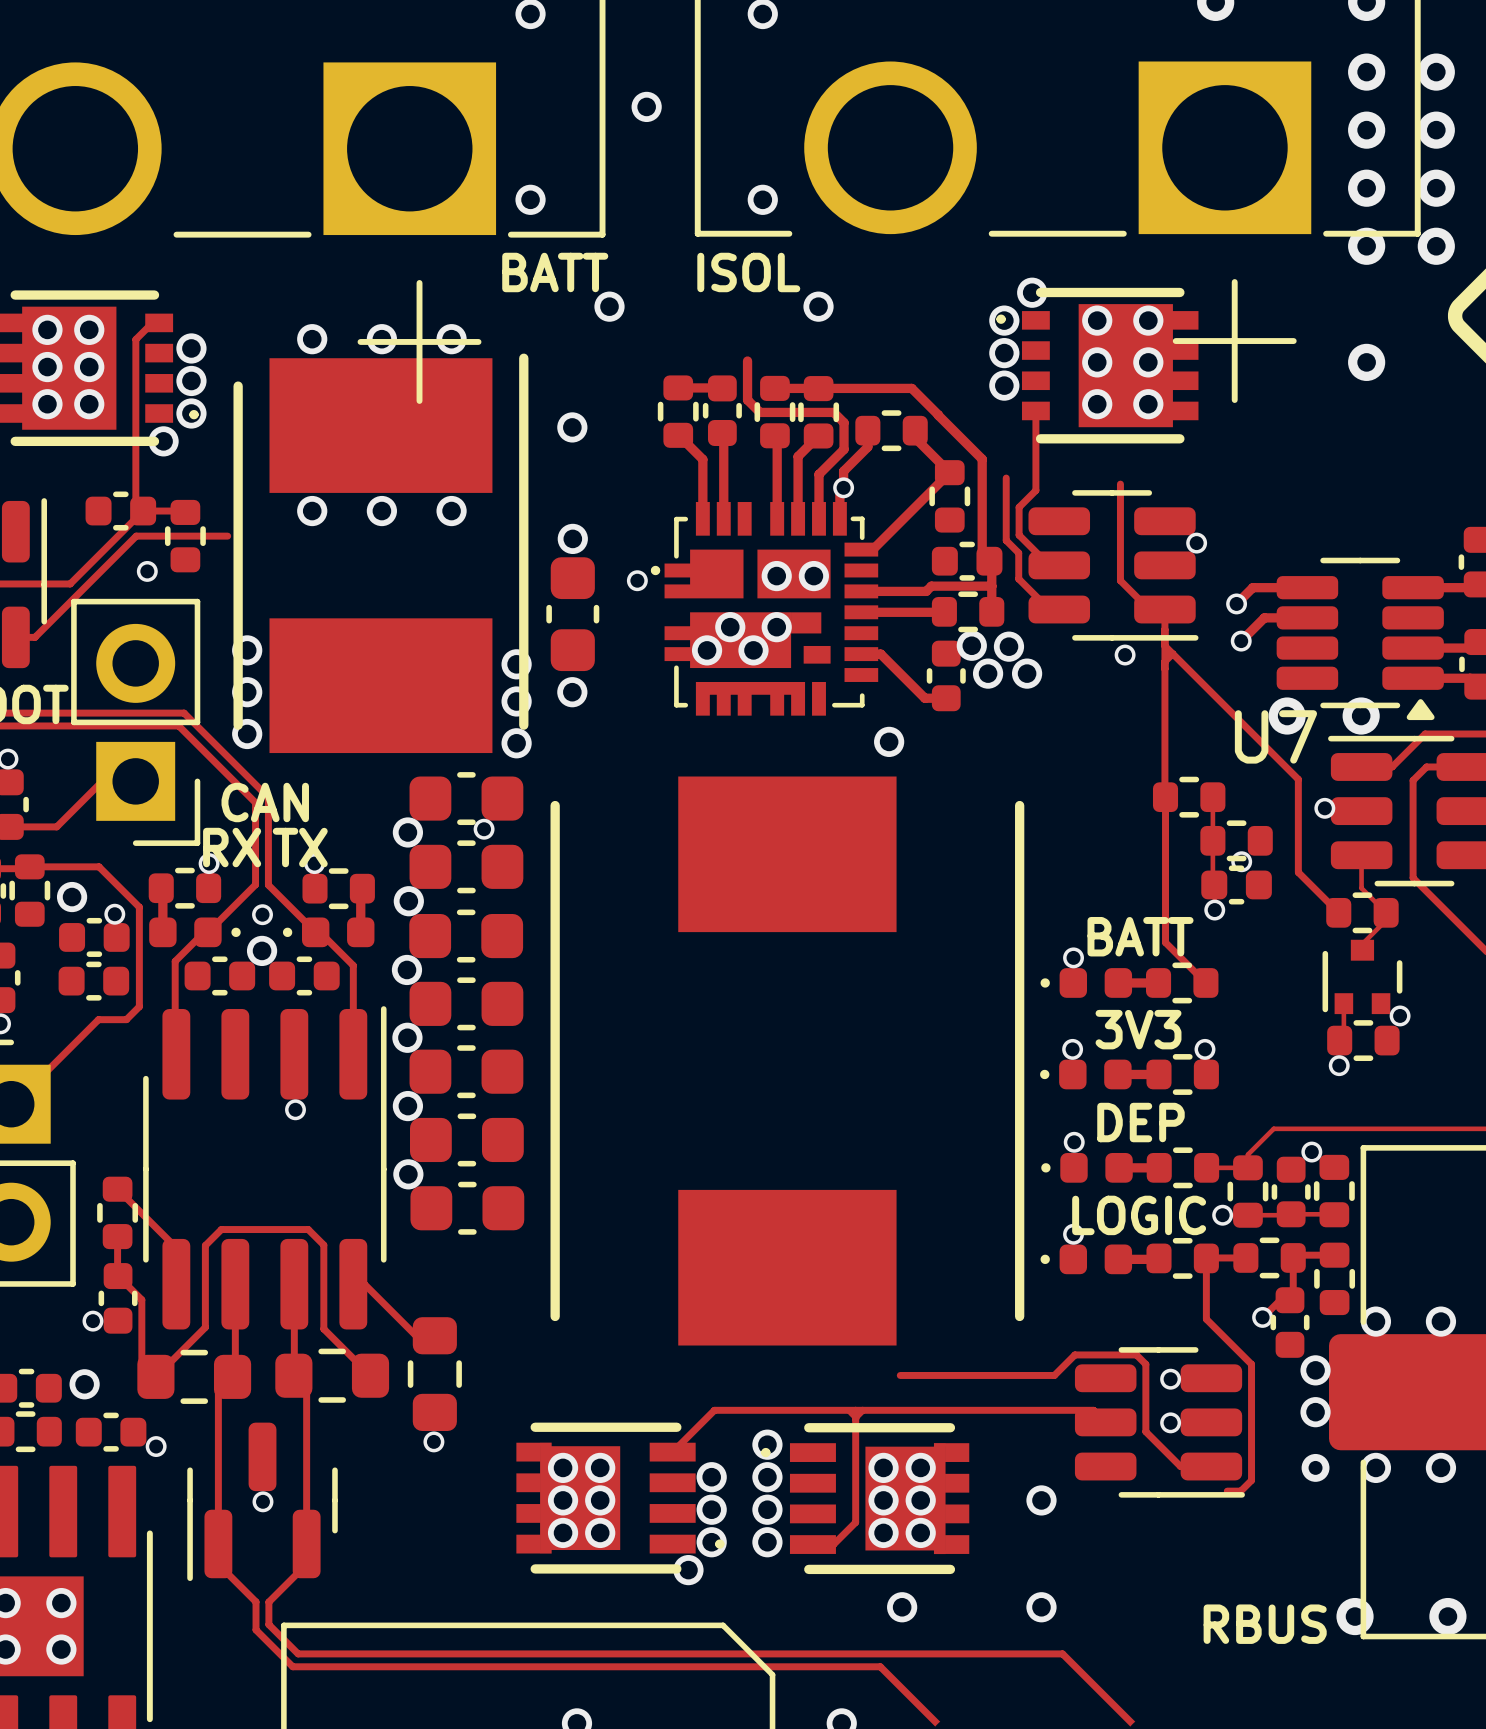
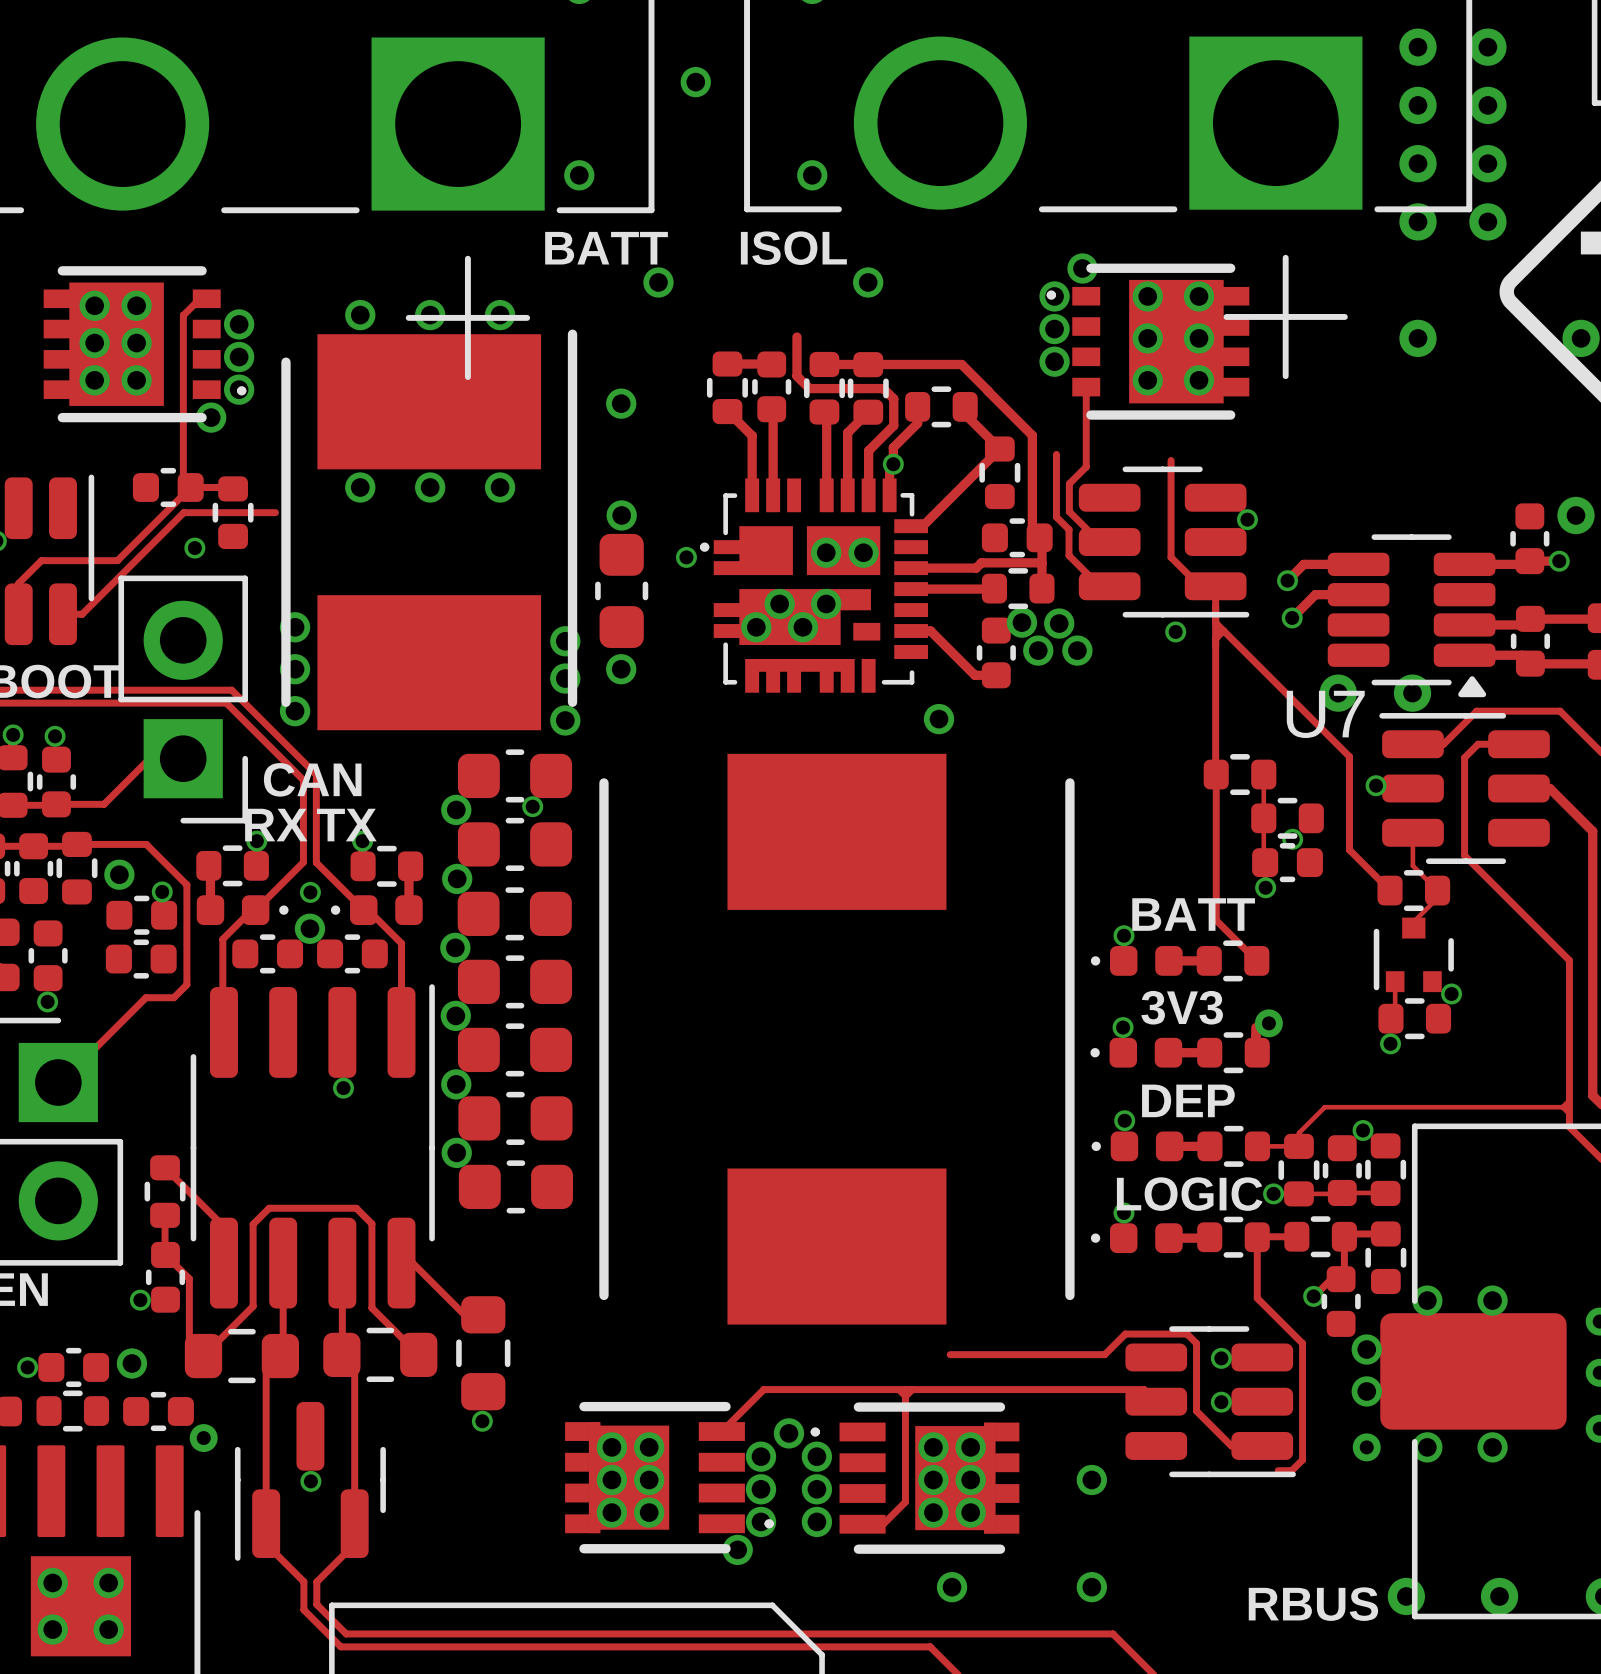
via size: [1194, 1038, 1216, 1060] -> [1254, 1009, 1283, 1038]
via size: [145, 1436, 167, 1458] -> [189, 1424, 218, 1453]
via position: (767, 1444) -> (788, 1433)

